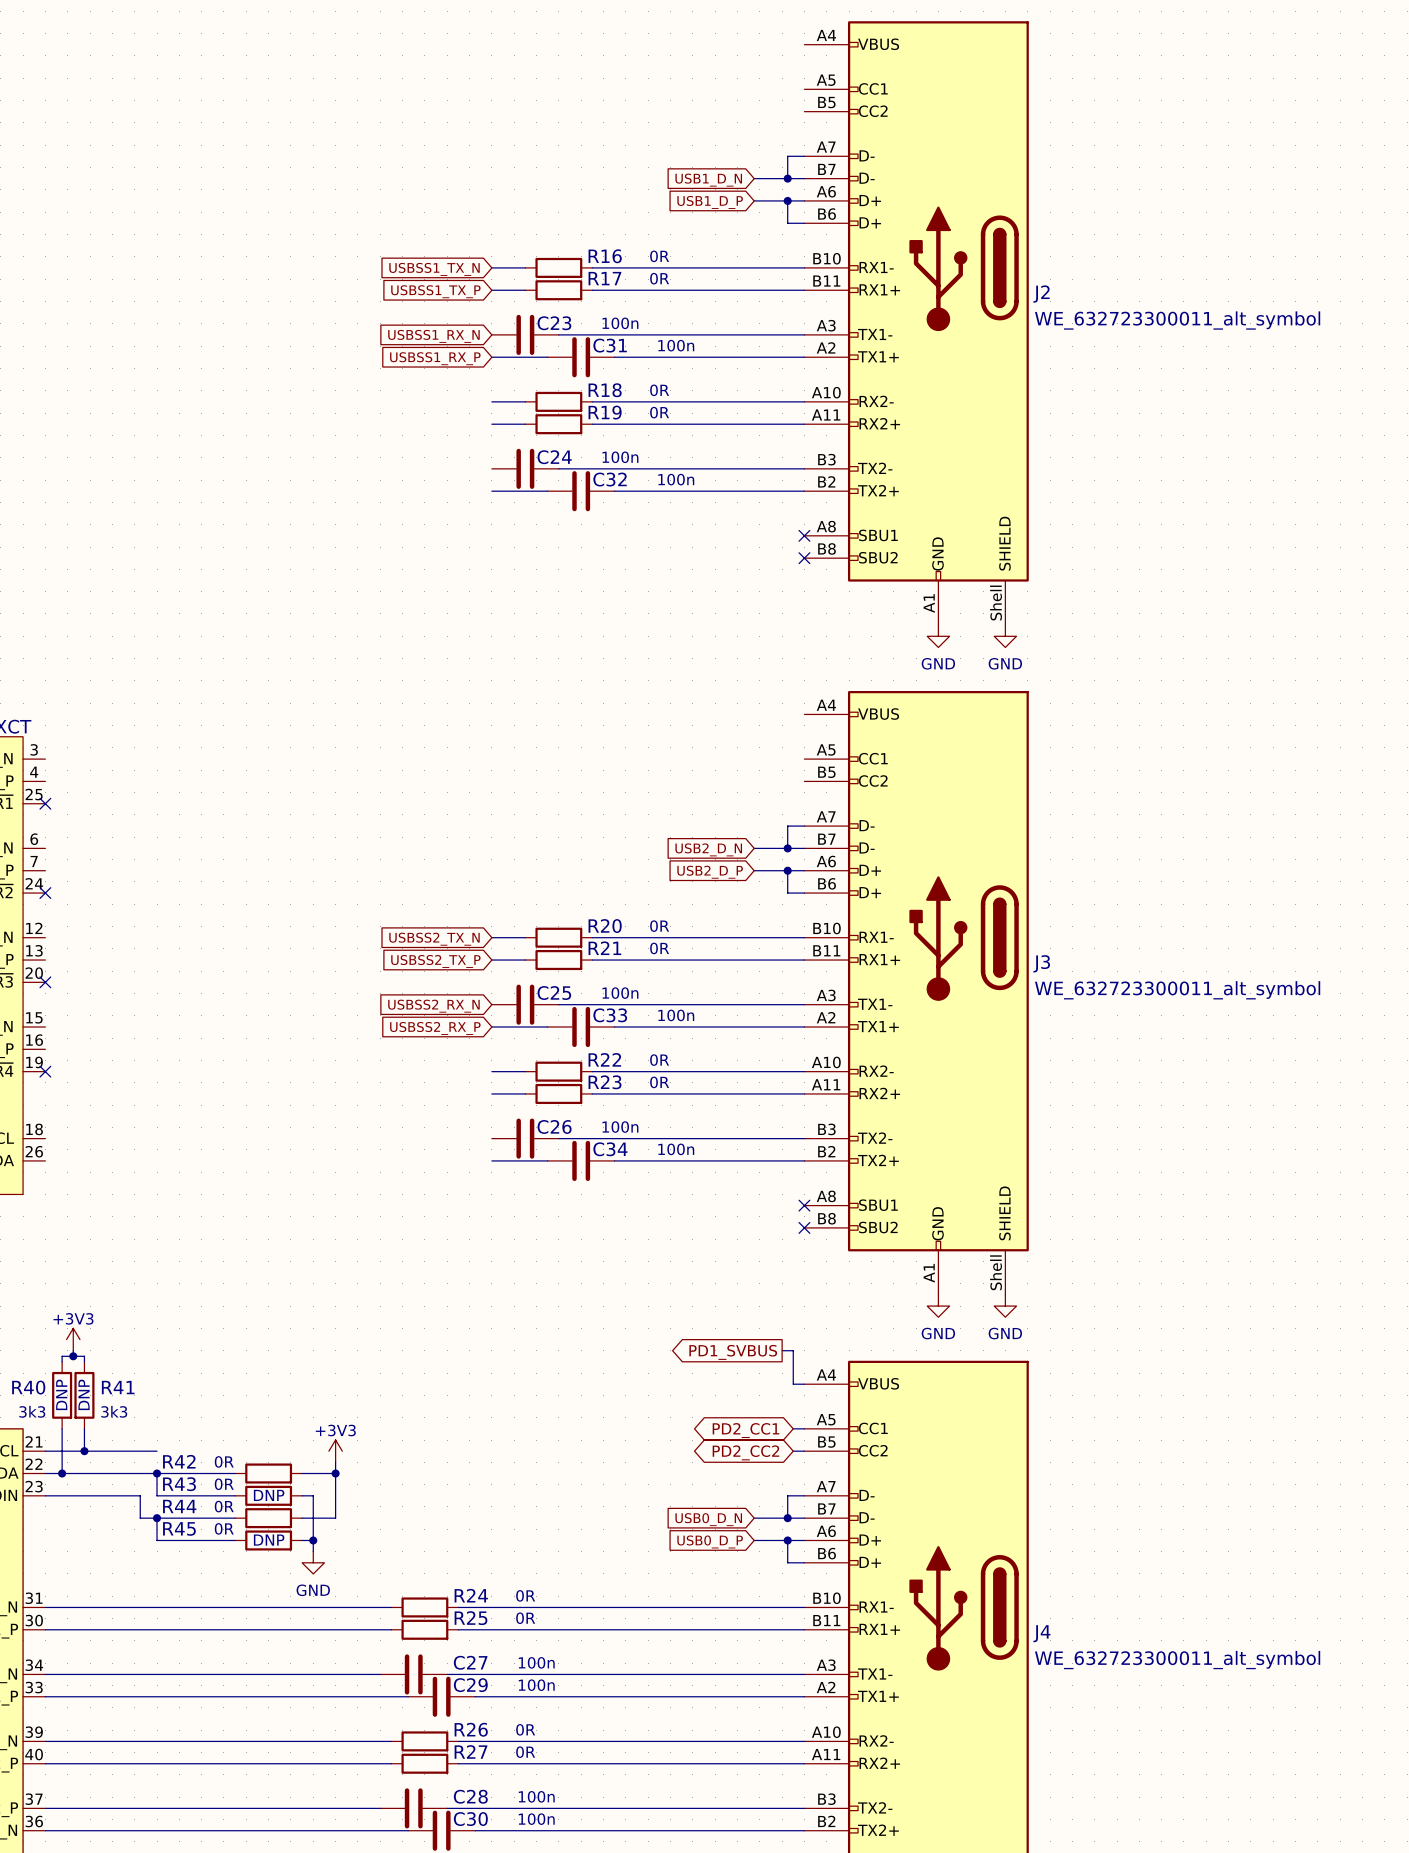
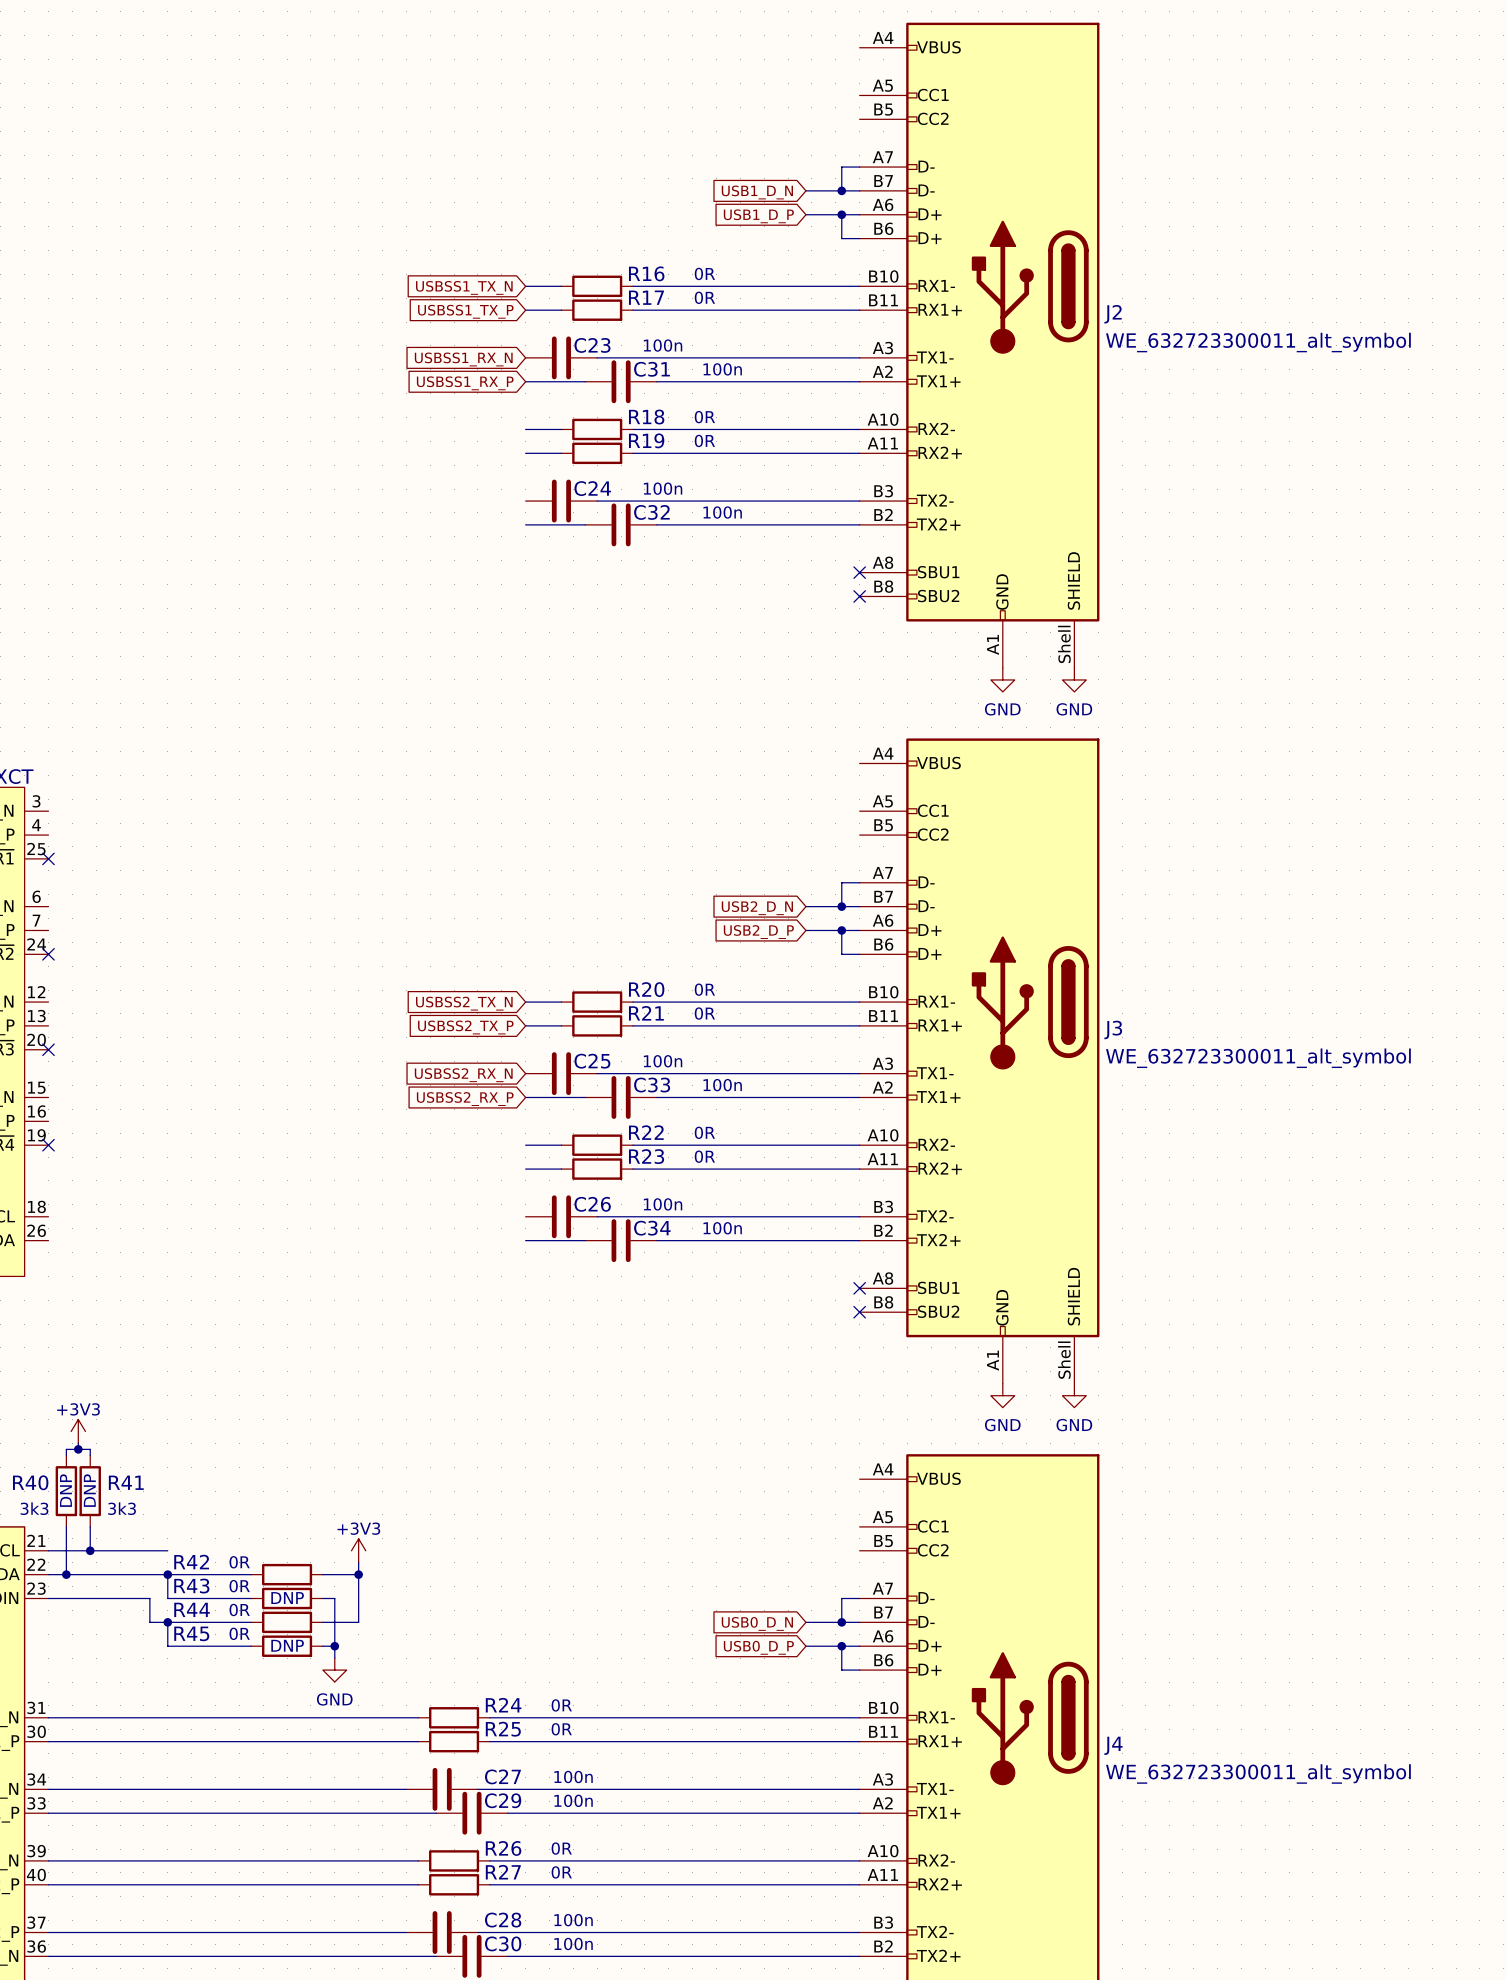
wire: (782, 1350) (793, 1350) (793, 1384) (804, 1384) -> none
global label: PD1_SVBUS (733, 1352) -> none
wire: (793, 1428) (804, 1428) -> none
global label: PD2_CC1 (745, 1430) -> none
wire: (793, 1451) (804, 1451) -> none
global label: PD2_CC2 (745, 1452) -> none

